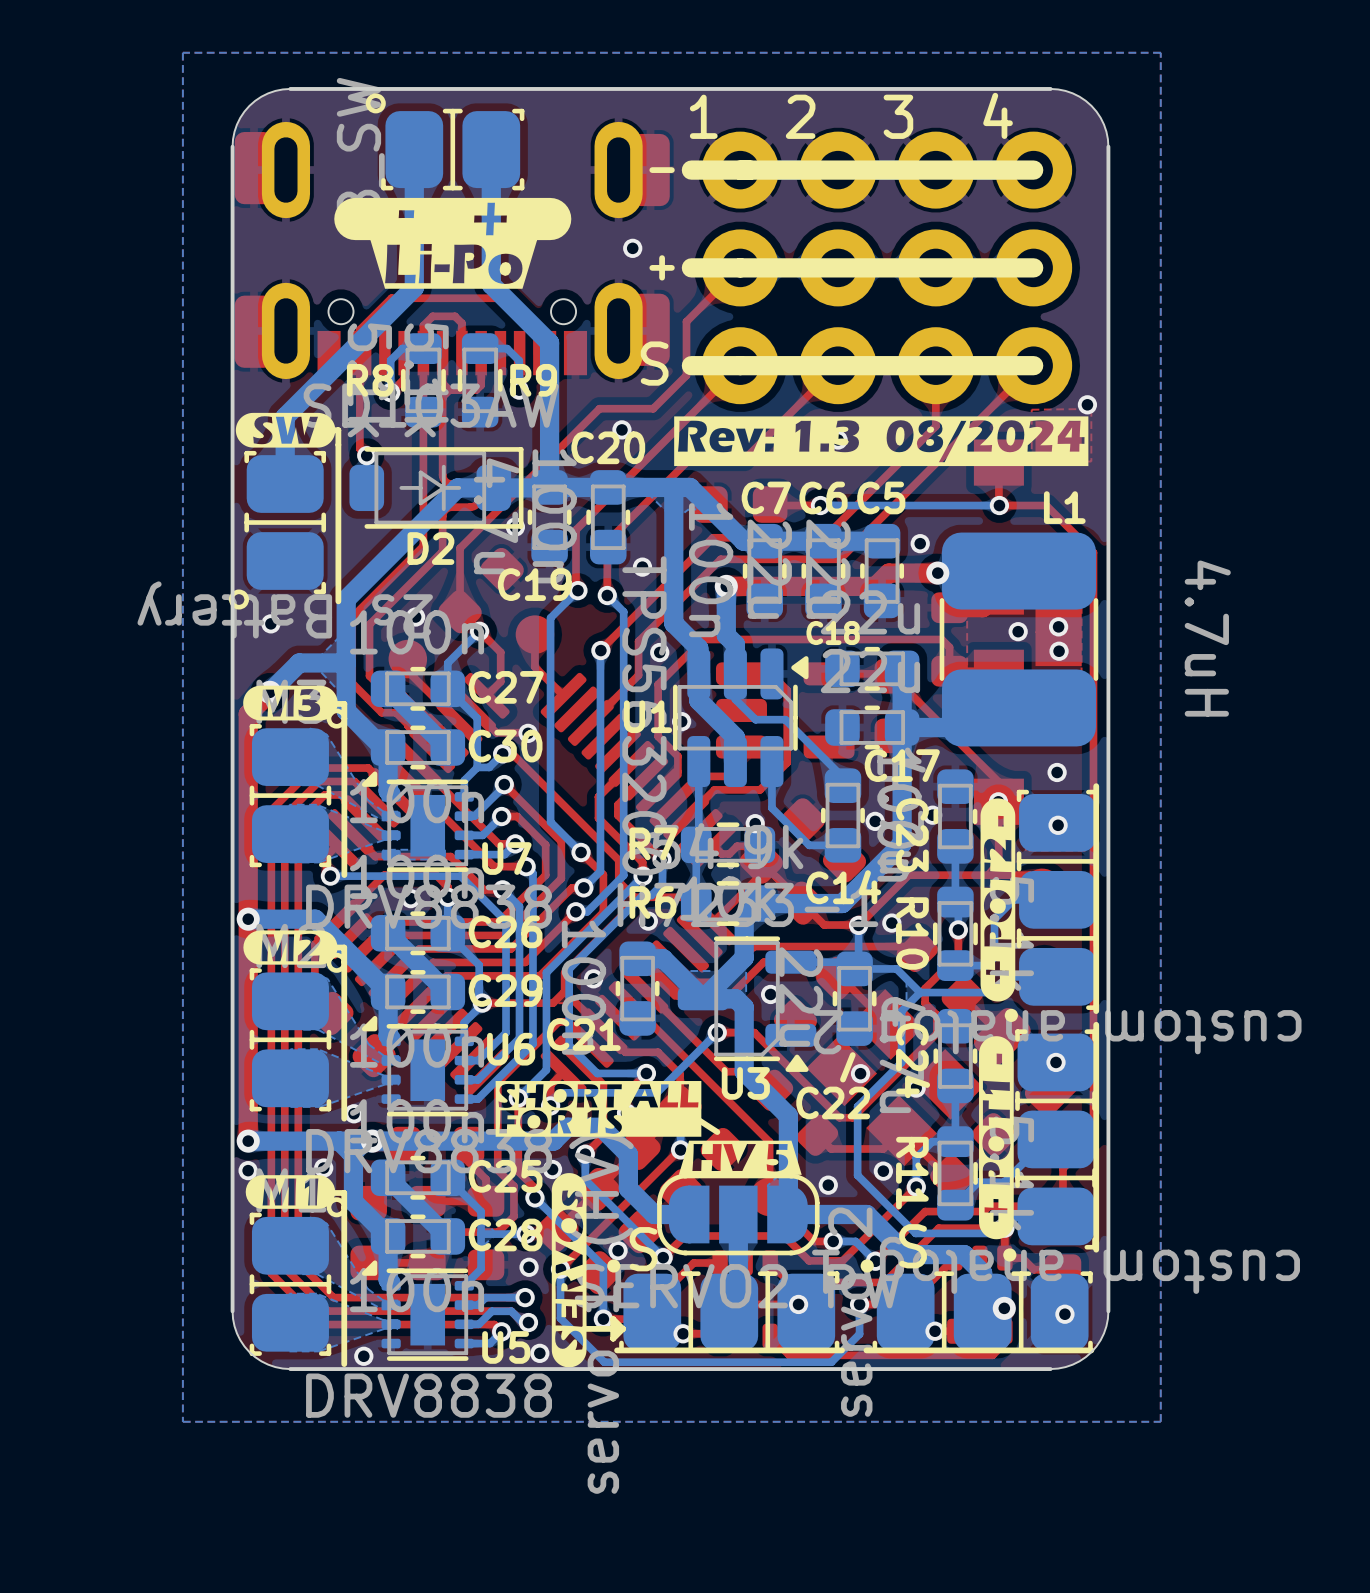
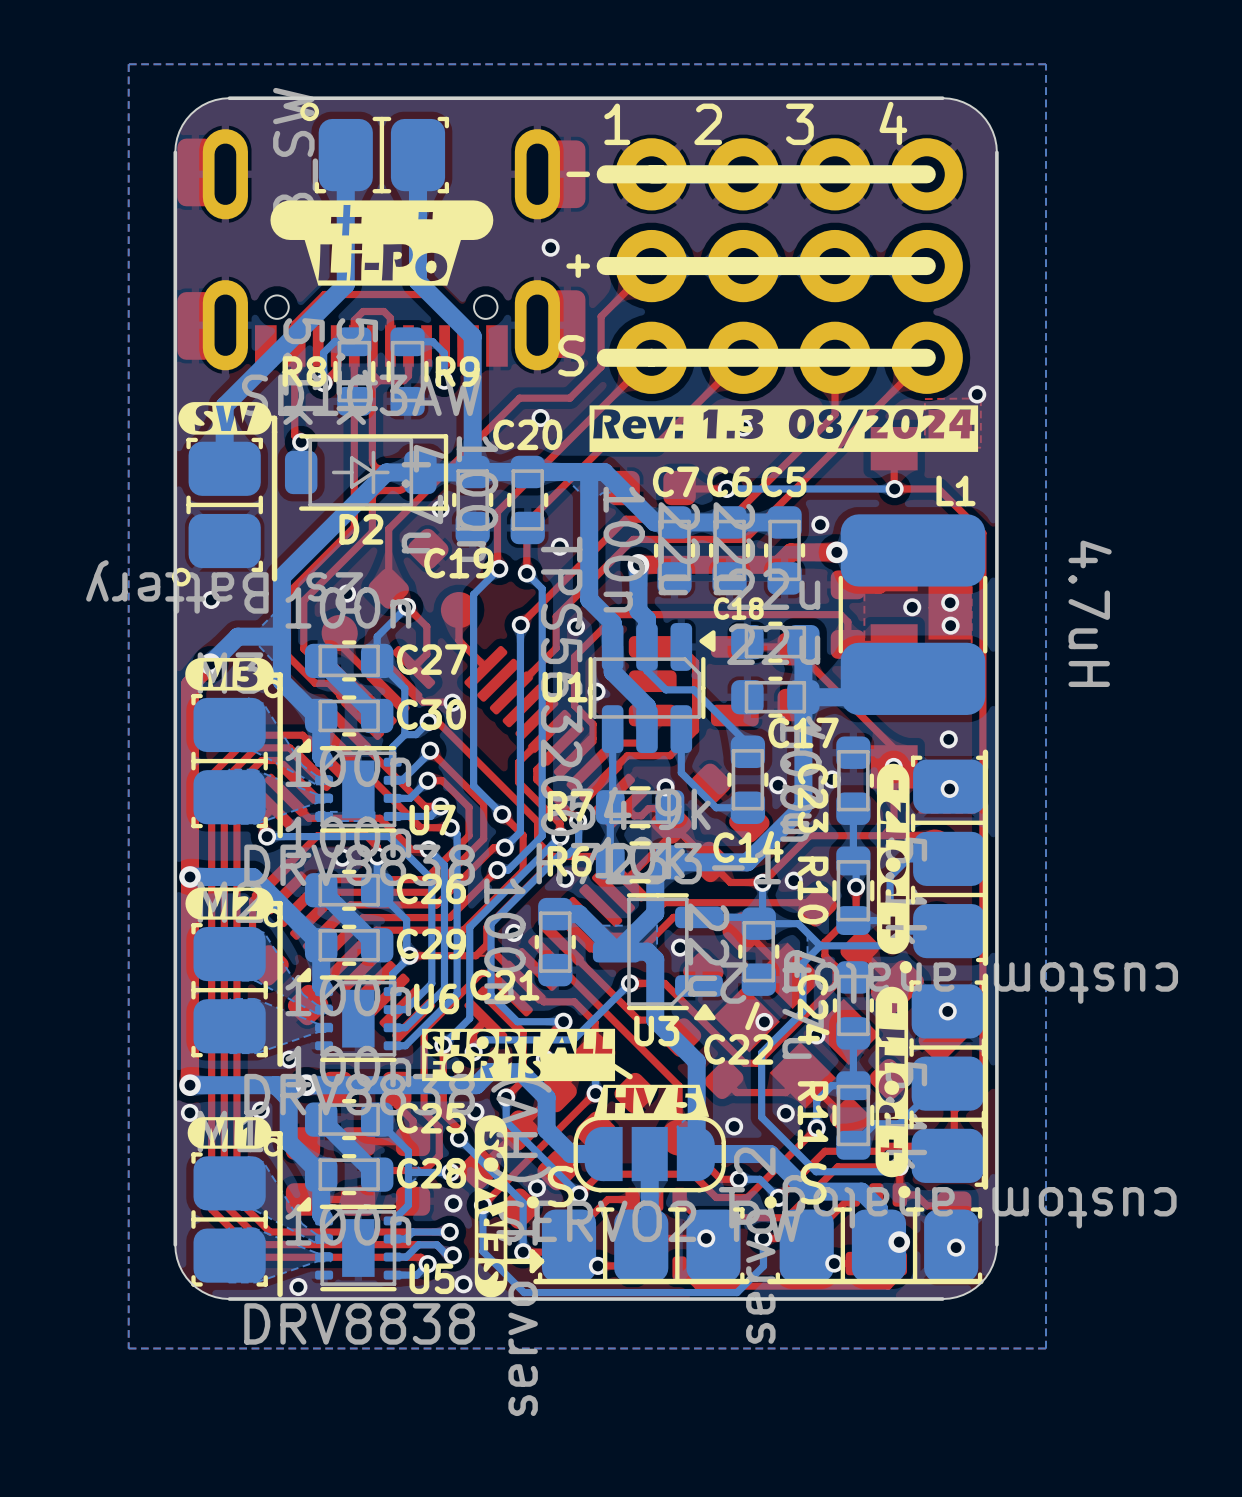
drawing shape: [334, 197, 572, 241] -> [270, 200, 494, 240]

